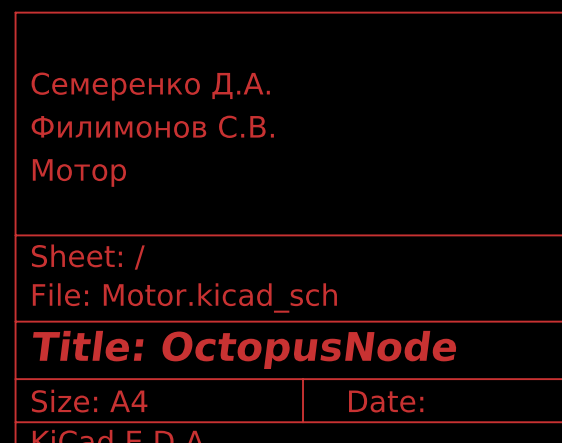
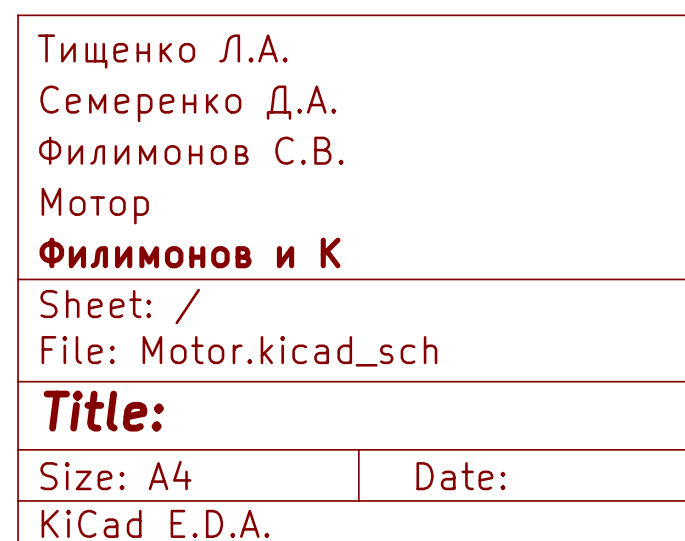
title block: none -> Тищенко Л.А. (162, 51)
title block: none -> Филимонов и К (189, 252)
title block: Title: OctopusNode (244, 349) -> Title: (103, 411)

